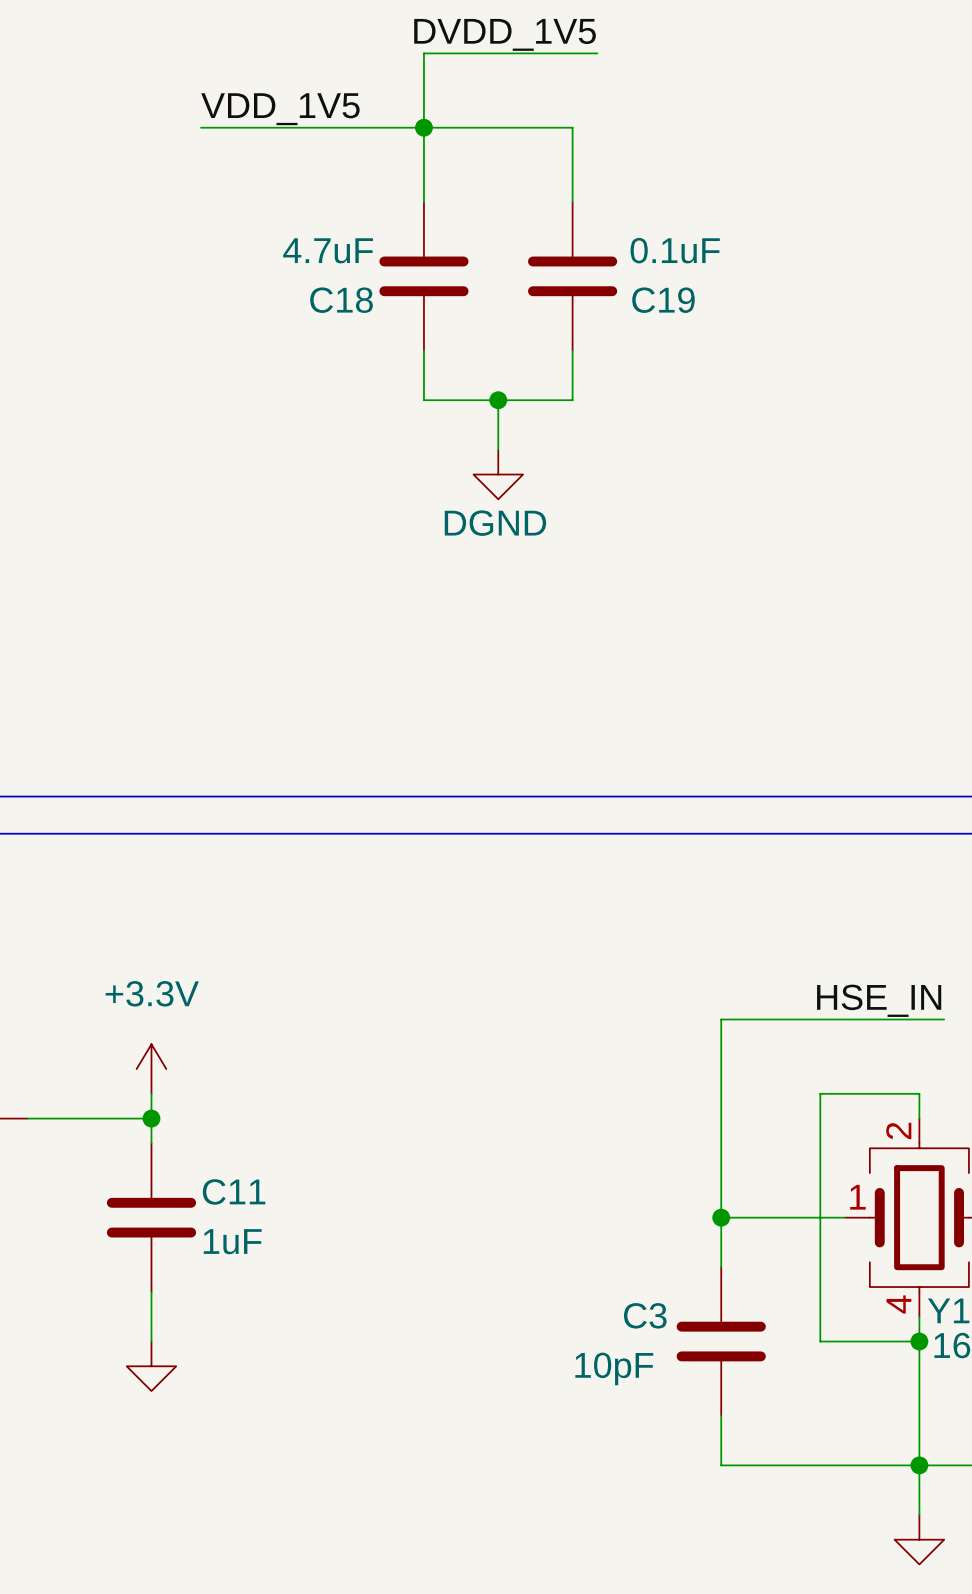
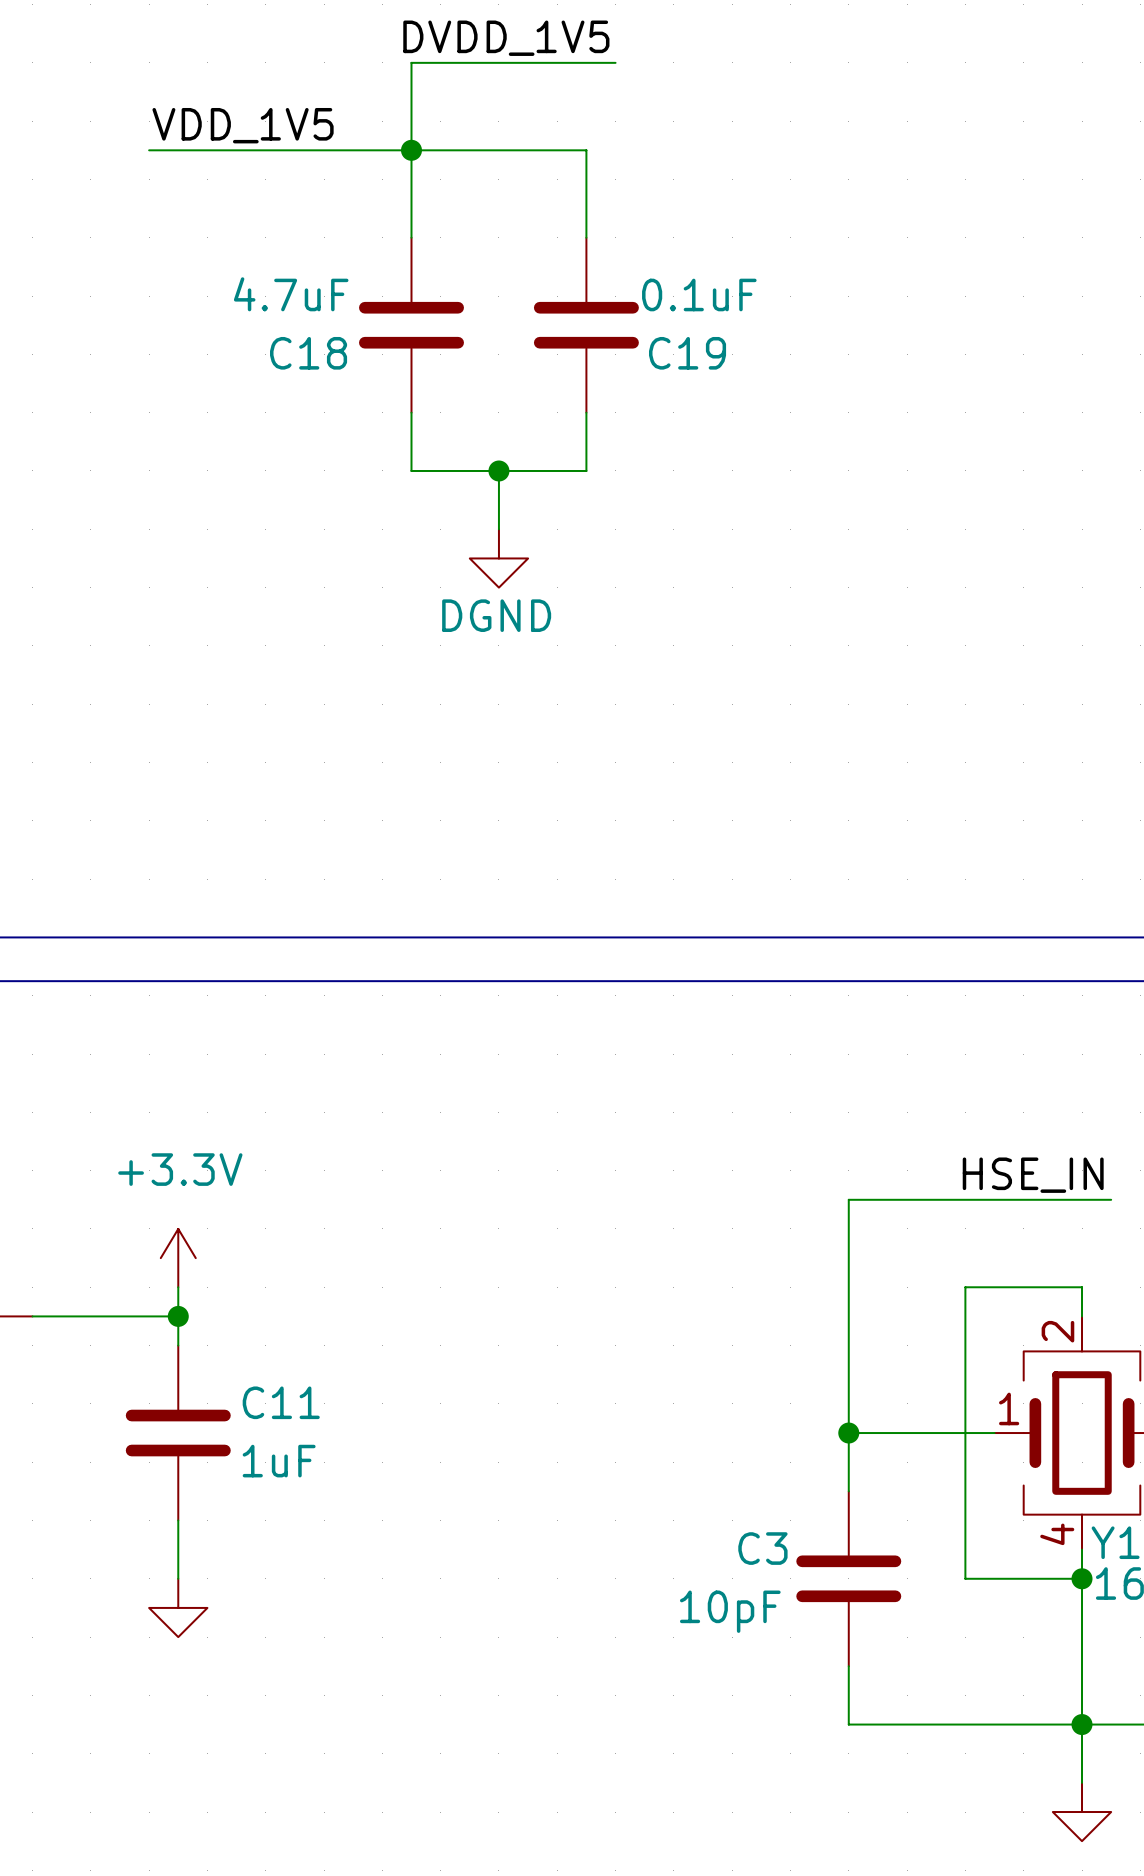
label position: DVDD_1V5 (505, 34) -> DVDD_1V5 (506, 38)
wire: (423, 53) (423, 202) -> (498, 62) (411, 62) (411, 237)
wire: (523, 53) (597, 53) -> (149, 150) (236, 150)
label position: VDD_1V5 (280, 109) -> VDD_1V5 (243, 125)
junction position: (423, 127) -> (411, 150)
wire: (498, 127) (572, 127) (572, 202) -> (586, 150) (586, 237)
C18 position: (423, 276) -> (411, 325)
C19 position: (572, 276) -> (586, 325)
wire: none -> (411, 412) (411, 470) (498, 470) (498, 529)
wire: (423, 350) (423, 400) -> (586, 412) (586, 470)
wire: (572, 350) (572, 400) (498, 400) (498, 449) -> none
junction position: (498, 400) -> (498, 470)
power symbol position: DGND (498, 474) -> DGND (498, 558)

